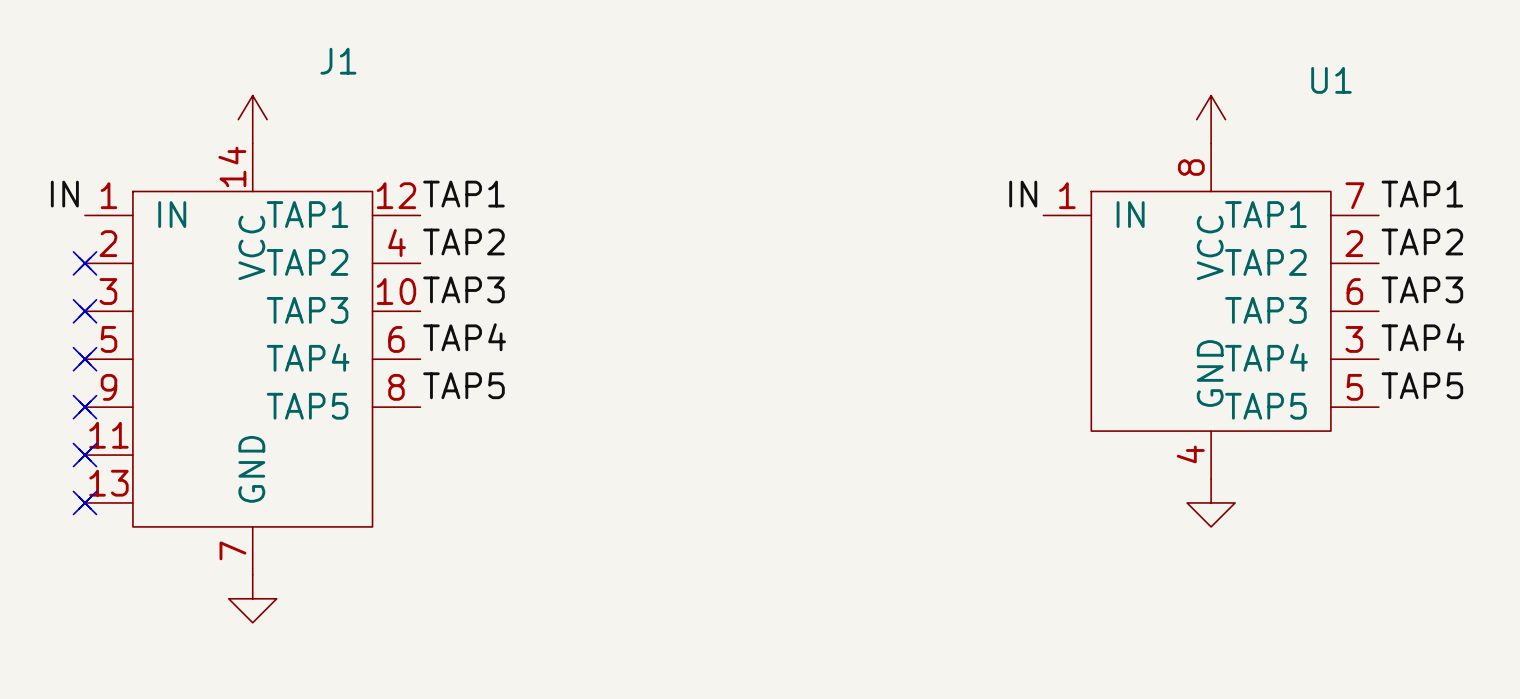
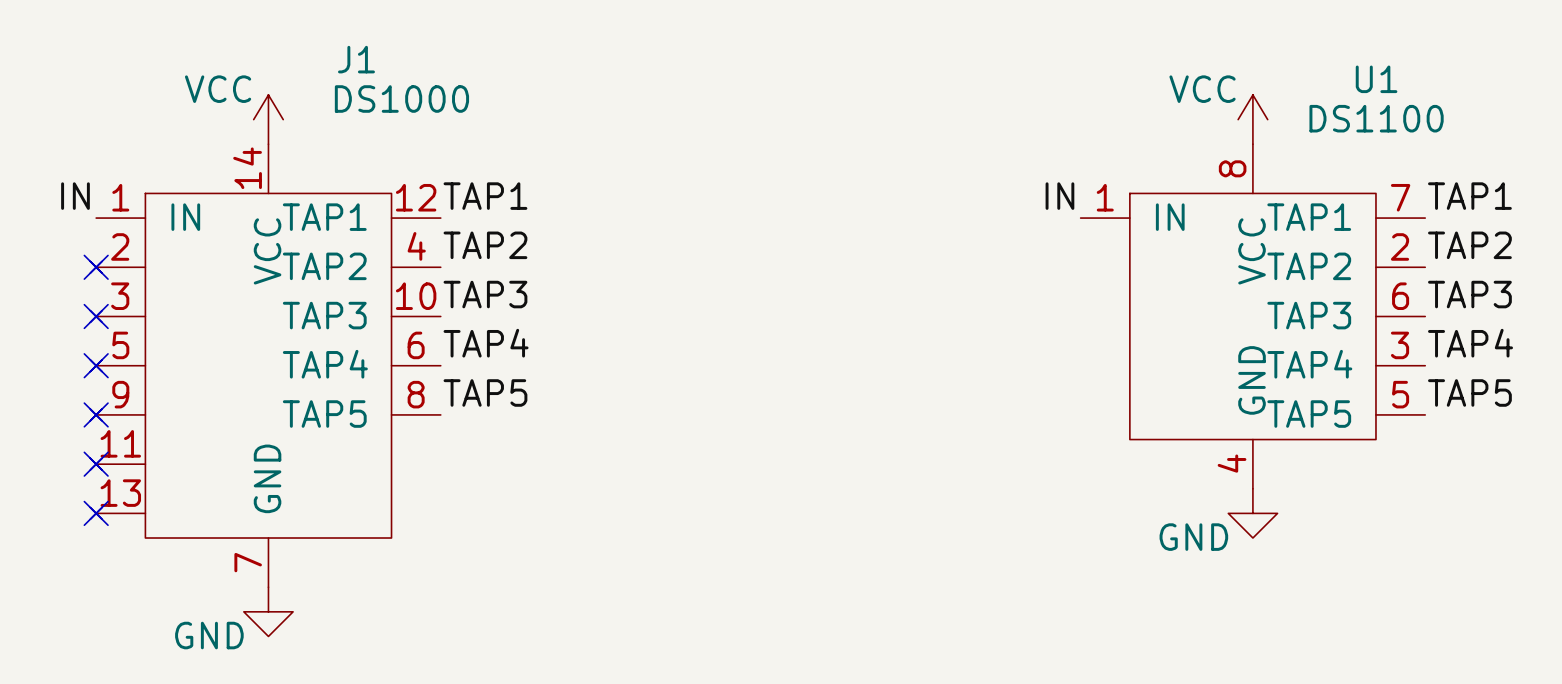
power symbol text: none -> VCC (218, 89)
power symbol text: none -> VCC (1202, 89)
J1 value: none -> DS1000 (401, 99)
U1 value: none -> DS1100 (1376, 118)
power symbol text: none -> GND (1193, 537)
power symbol text: none -> GND (209, 635)

